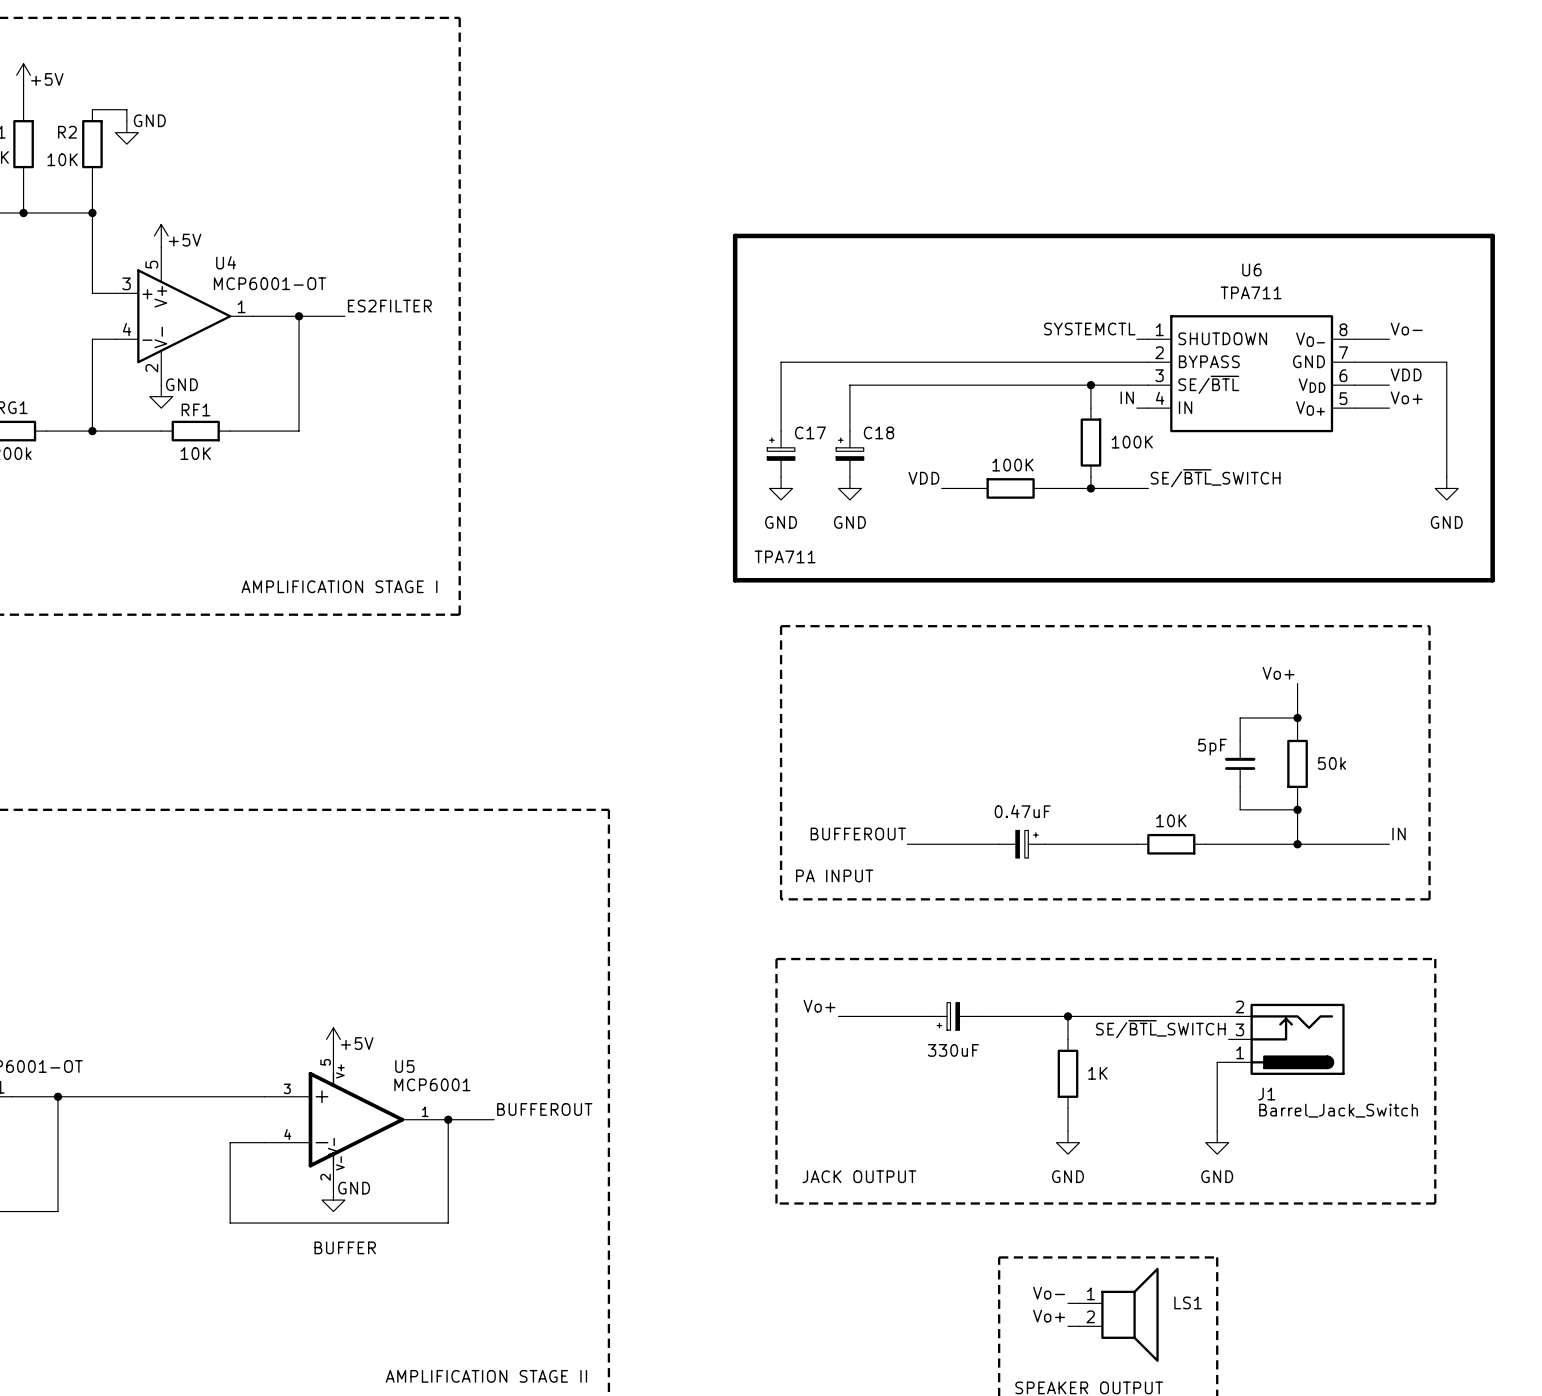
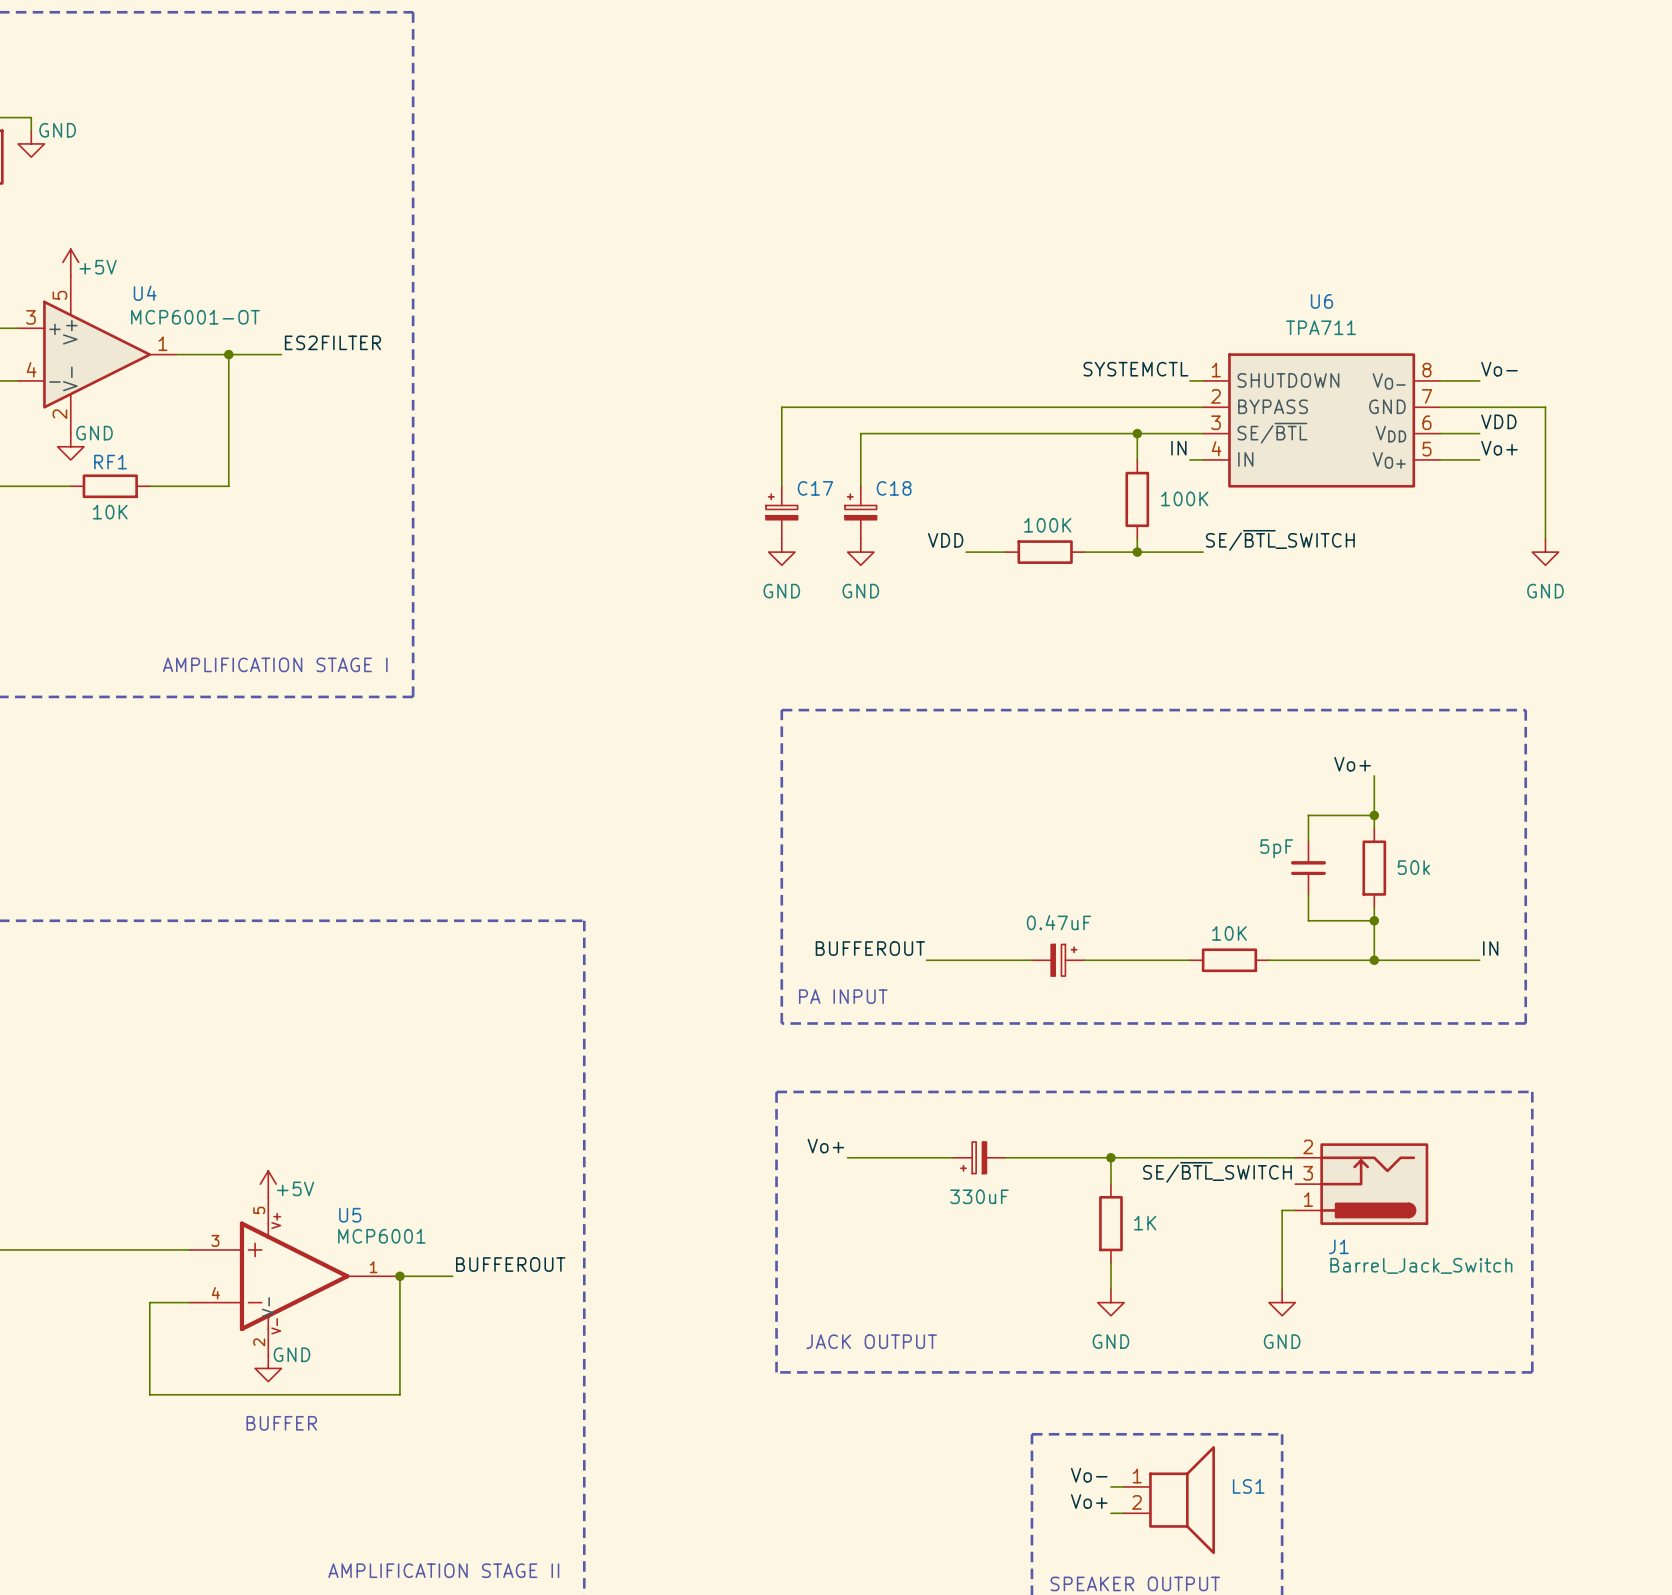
line: (735, 235) (1492, 235) (1492, 580) (735, 580) (735, 235) -> none
text: TPA711 (785, 556) -> none

